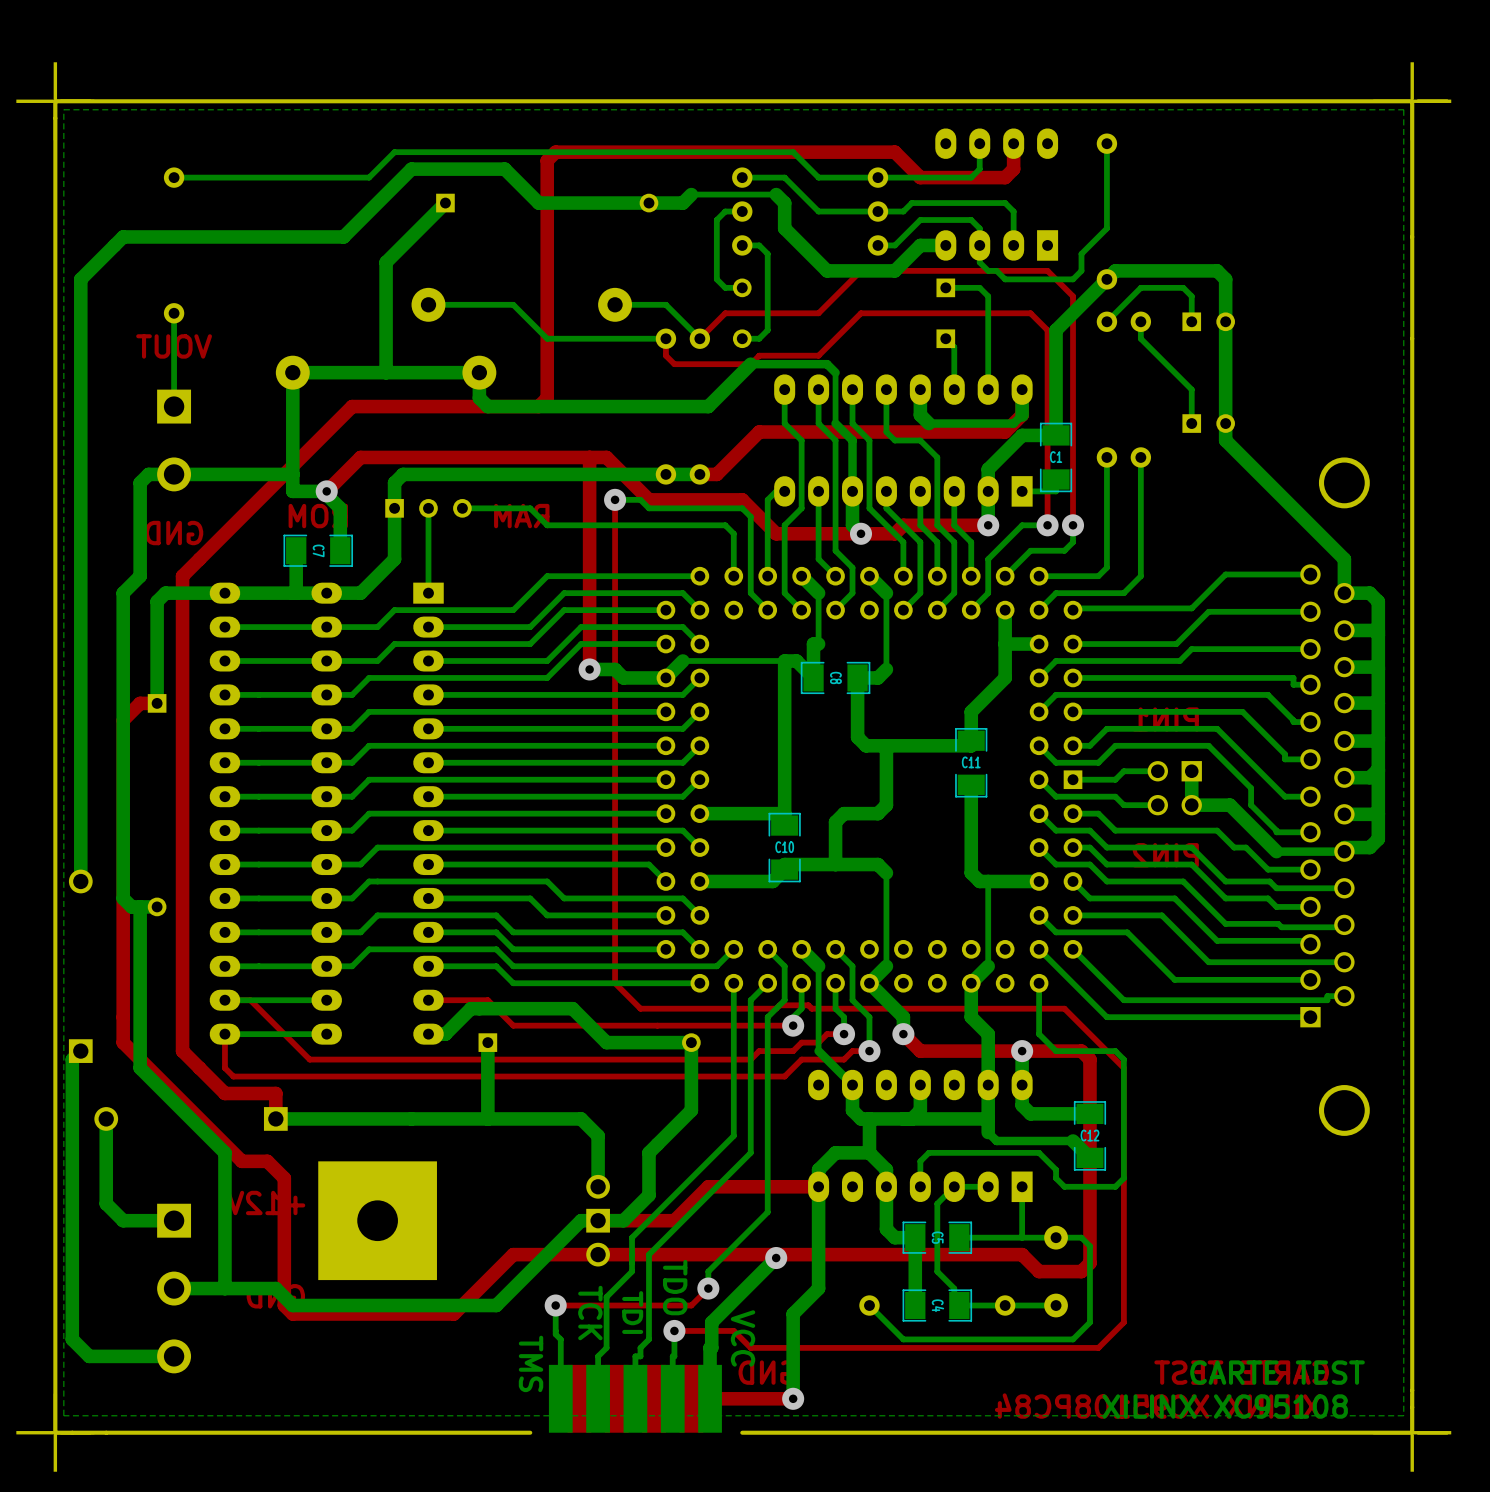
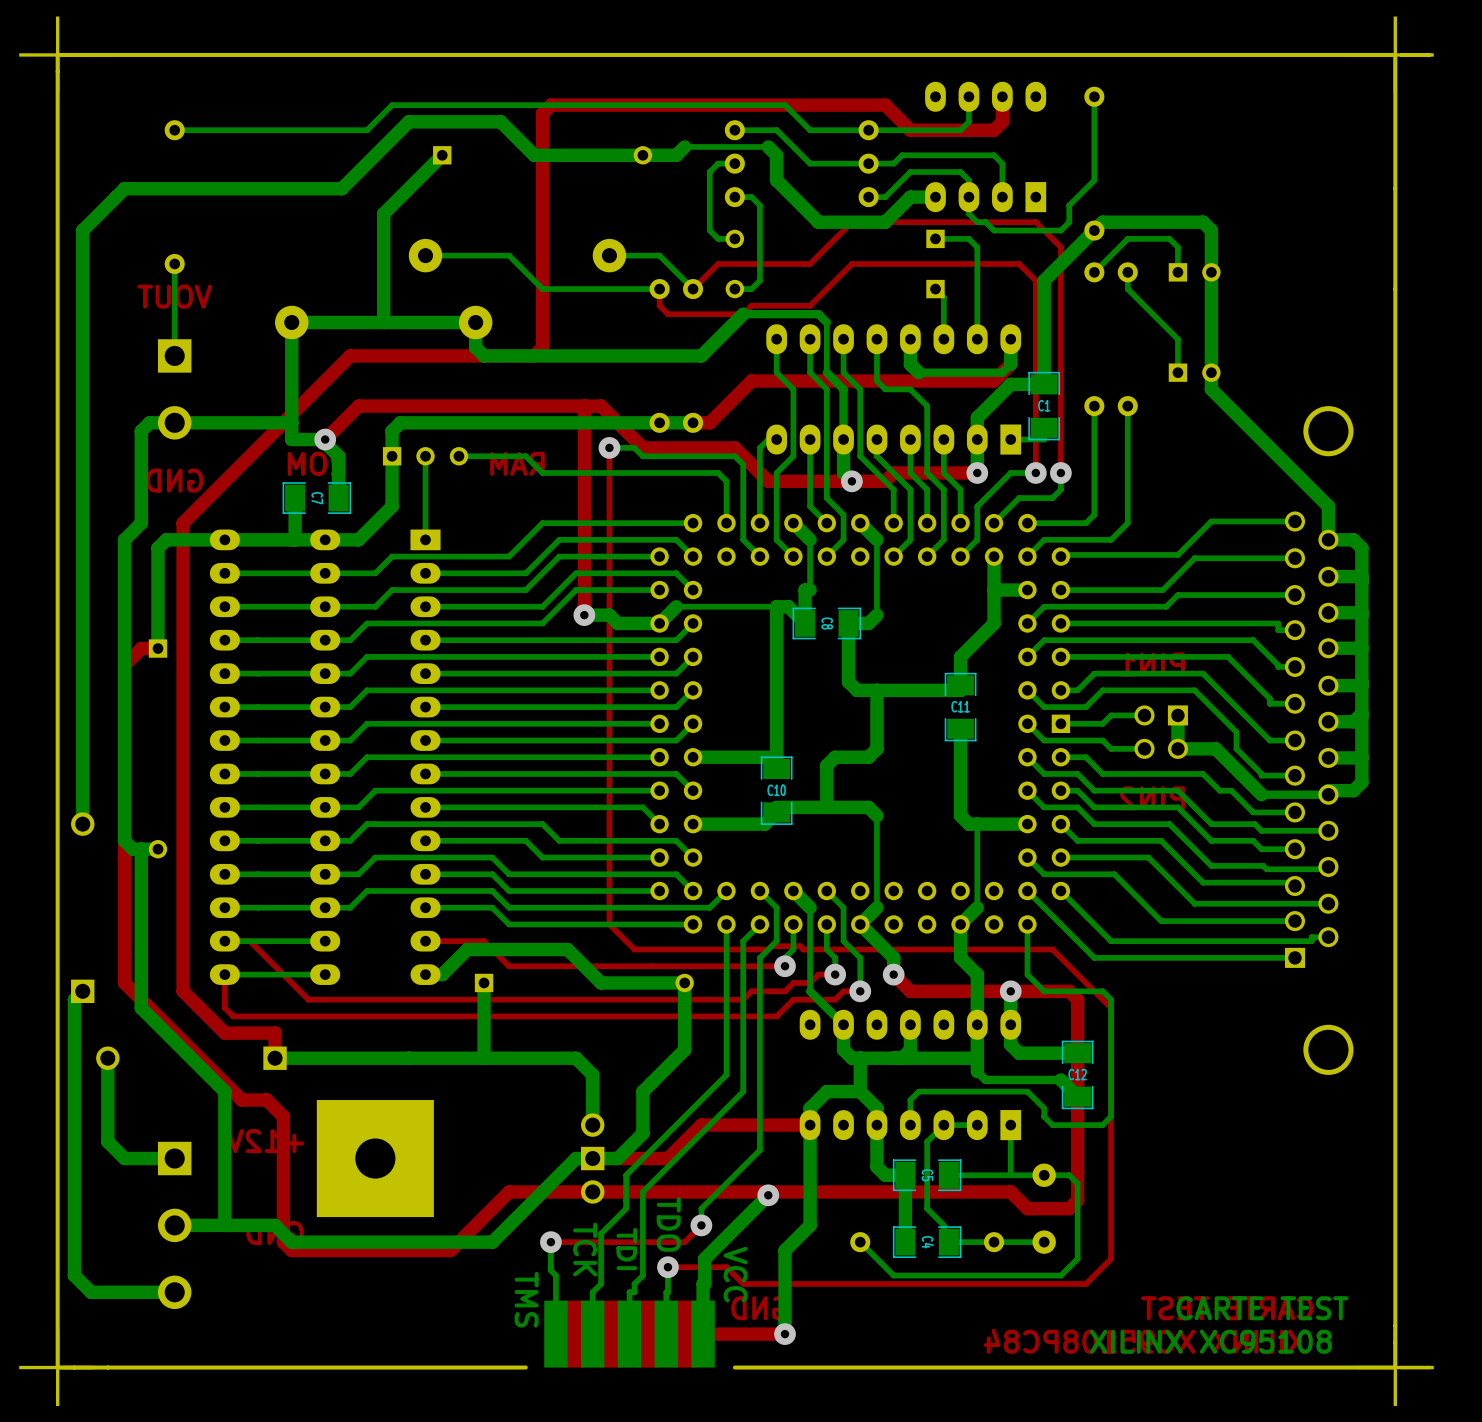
bottom zone outline: (1403, 109) (63, 109) (63, 1415) (1403, 1415) (1403, 109) -> none

